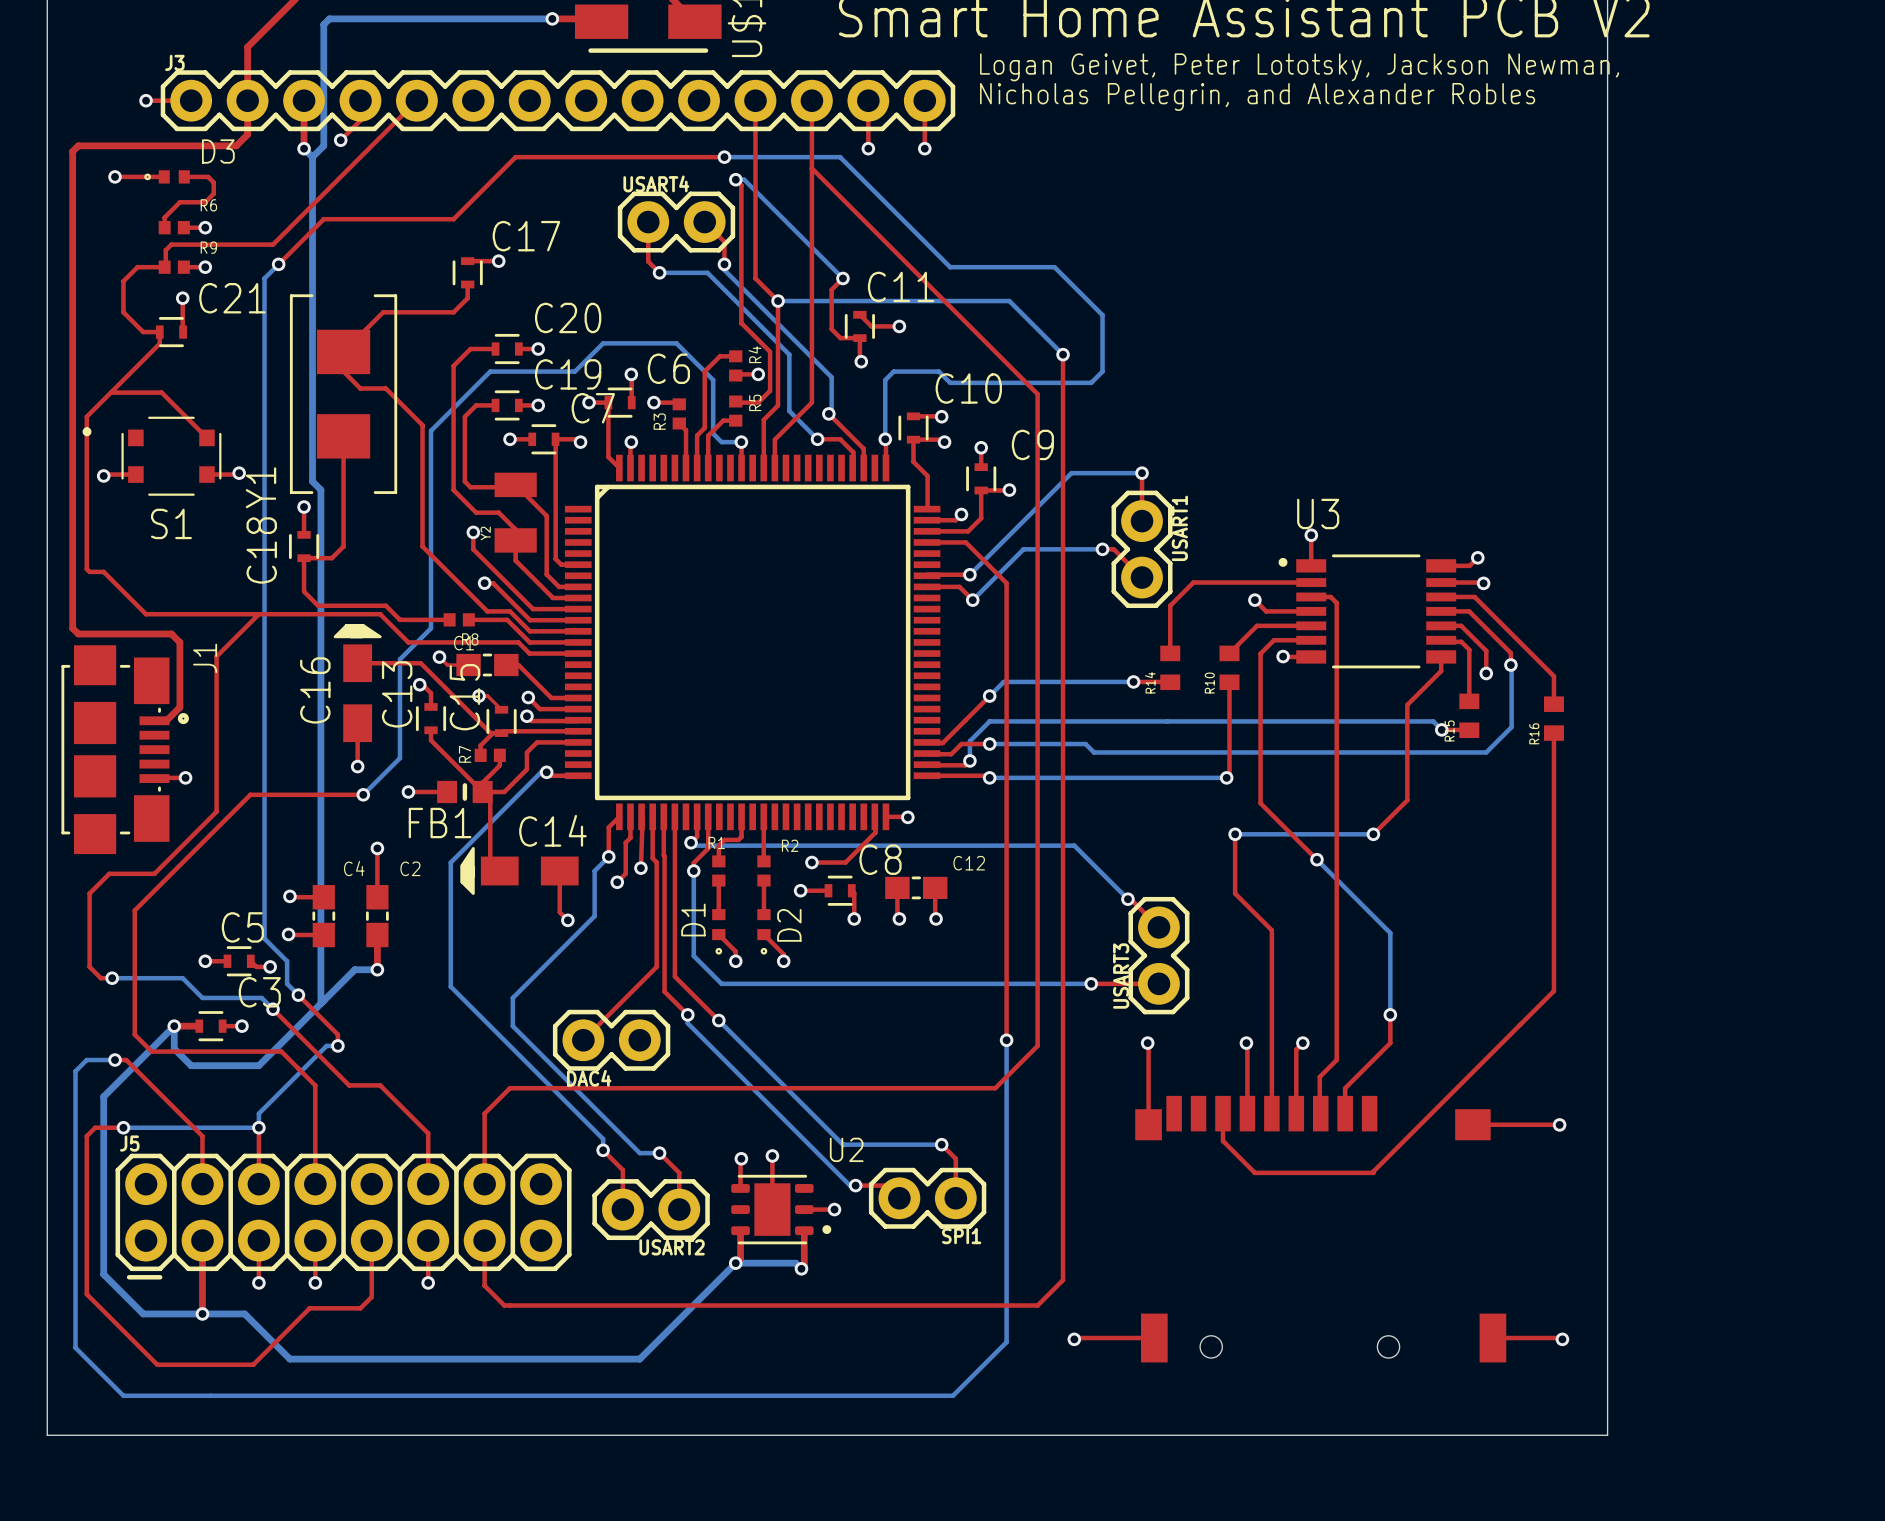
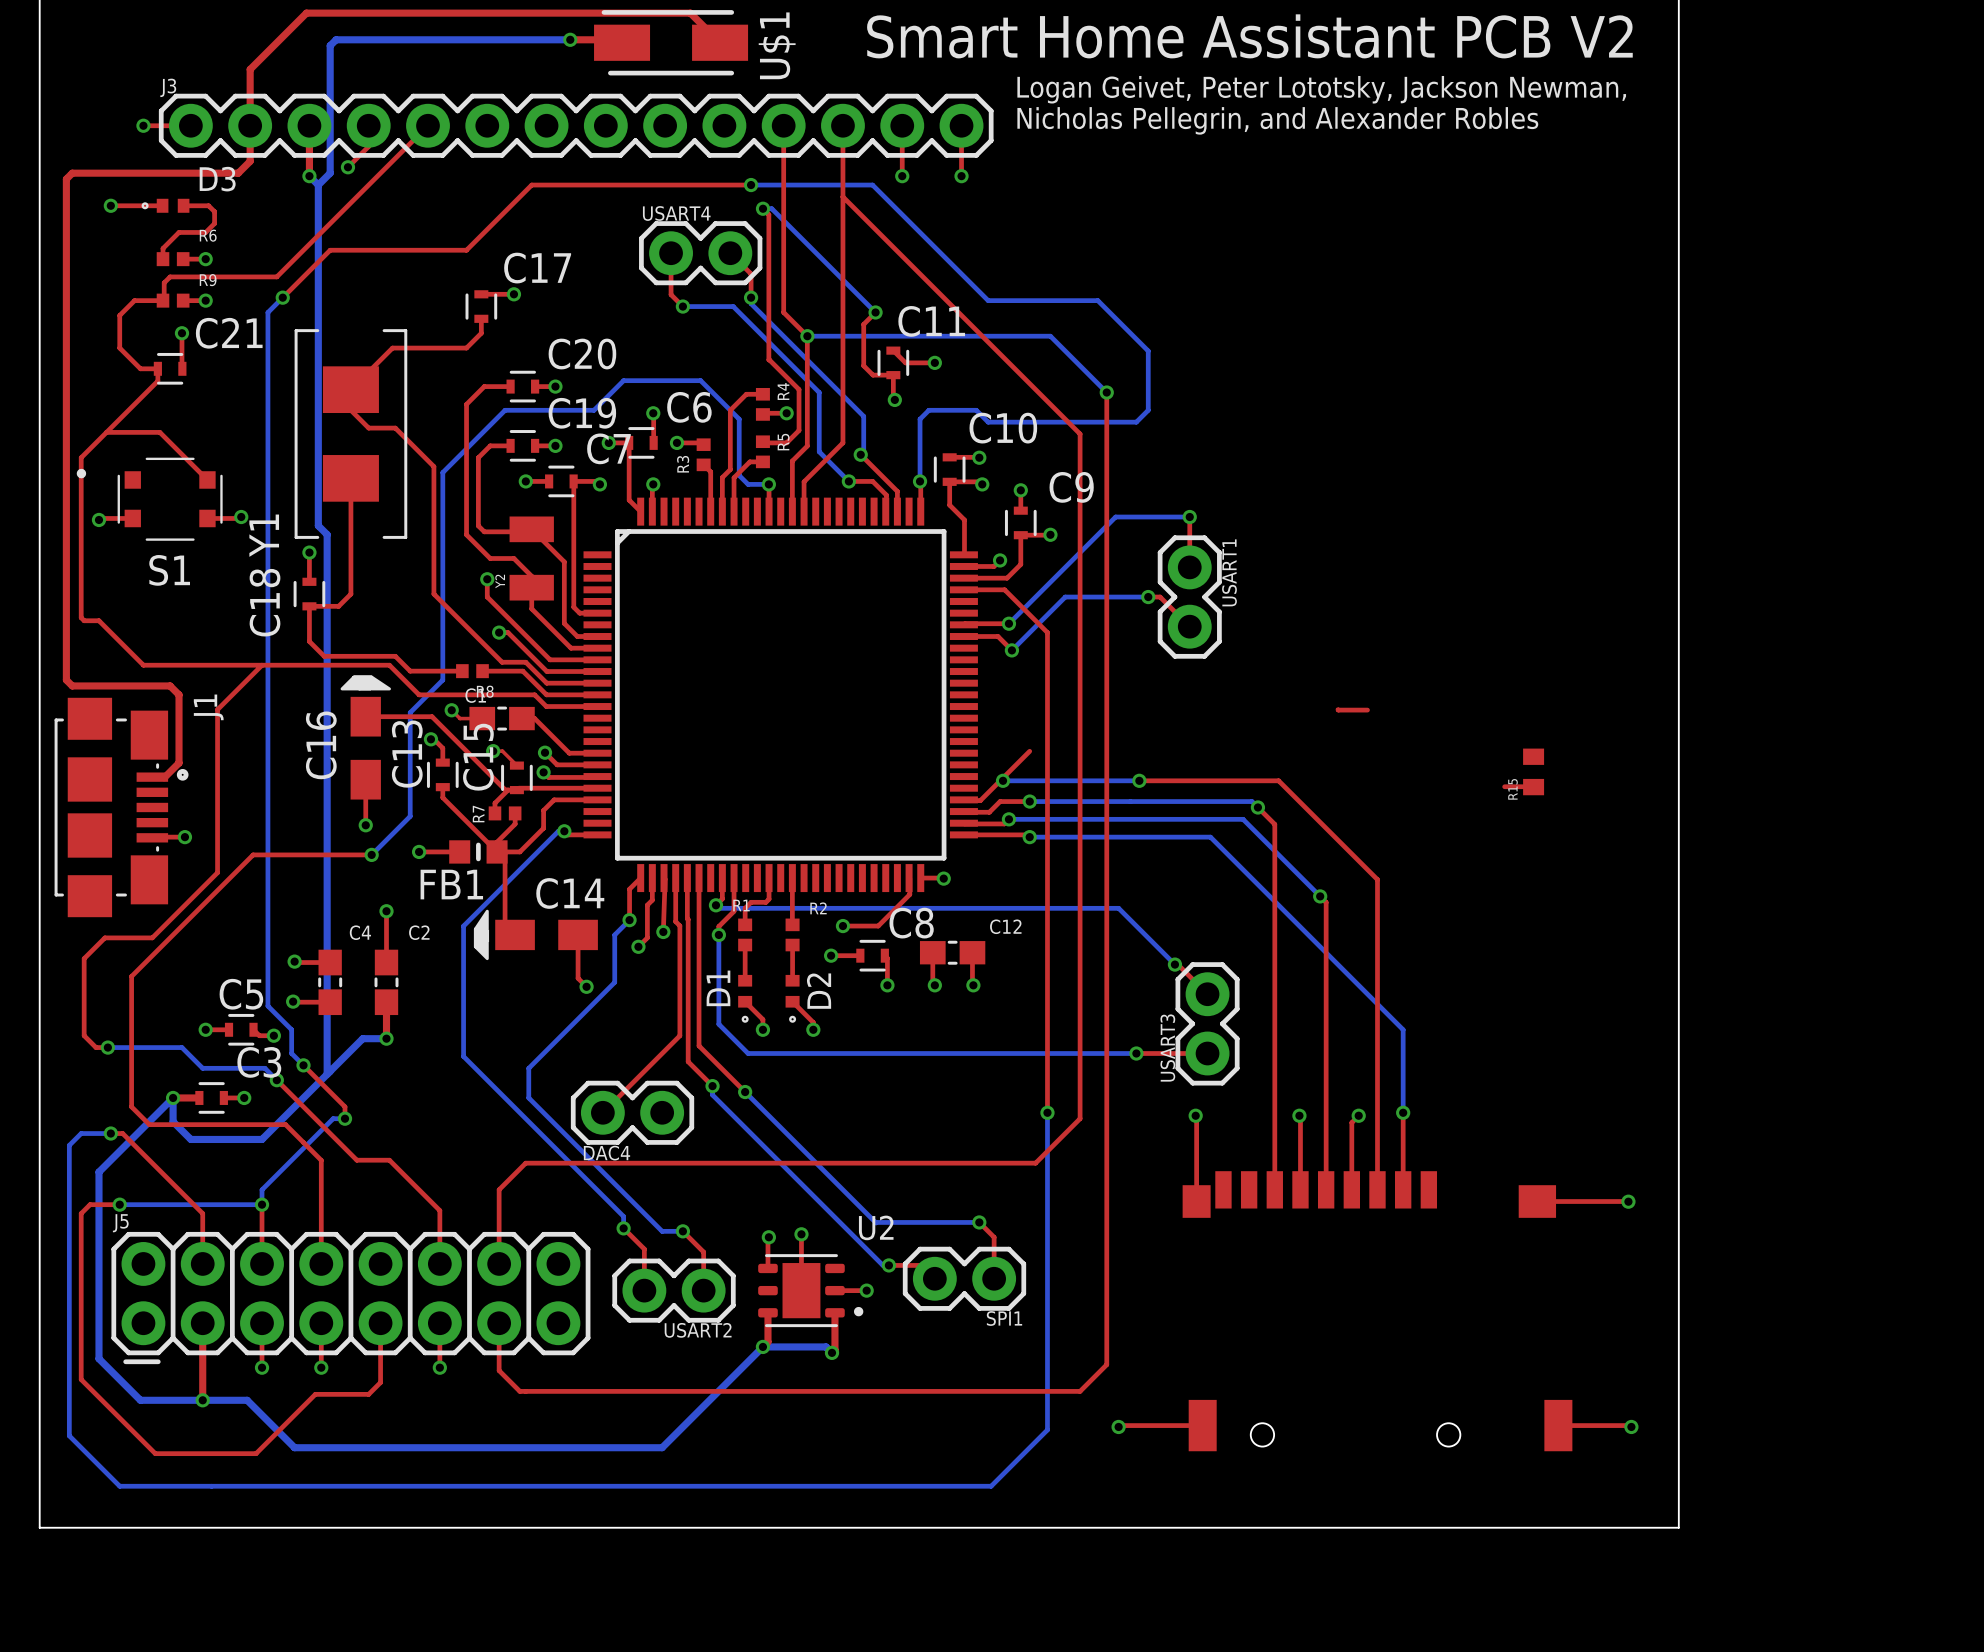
top track: (1311, 535) (1311, 565) -> none
via: (1311, 535) -> none
top track: (1477, 557) (1469, 565) (1441, 565) -> none
via: (1477, 557) -> none
top track: (1311, 582) (1193, 582) (1170, 605) (1170, 653) -> none
top track: (1441, 582) (1483, 583) -> none
via: (1483, 583) -> none
top track: (1311, 596) (1330, 596) (1336, 602) (1336, 1060) (1319, 1076) (1320, 1113) -> (1139, 780) (1278, 780) (1377, 879) (1377, 1189)
top track: (1441, 596) (1474, 596) (1553, 676) (1553, 704) -> none
top track: (1254, 600) (1266, 611) (1311, 611) -> none
via: (1254, 600) -> none
U3: (1367, 611) -> none
top track: (1441, 611) (1469, 611) (1510, 653) (1510, 665) -> none
top track: (1311, 625) (1257, 625) (1229, 653) -> none
top track: (1441, 625) (1461, 625) (1486, 650) (1486, 673) -> none
top track: (1311, 640) (1273, 640) (1260, 653) (1260, 803) (1316, 859) -> none
top track: (1441, 640) (1461, 641) (1469, 649) (1469, 701) -> none
via: (1283, 656) -> none
top track: (1441, 656) (1441, 671) (1407, 704) (1407, 800) (1373, 834) -> none
bottom track: (1510, 665) (1511, 727) (1486, 752) (1094, 752) (1085, 744) -> (1257, 807) (1252, 801) (1130, 801)
via: (1510, 665) -> none
R14: (1170, 667) -> none
R10: (1229, 667) -> none
via: (1486, 673) -> none
top track: (1133, 681) (1170, 682) -> none
bottom track: (1133, 681) (1003, 681) (989, 696) -> none
via: (1133, 681) -> none
top track: (1229, 682) (1229, 775) (1226, 777) -> none
via position: (989, 696) -> (1003, 780)
R16: (1553, 718) -> none
bottom track: (989, 721) (969, 741) (969, 760) -> (1320, 896) (1243, 819) (1008, 819)
bottom track: (989, 721) (1433, 721) (1441, 729) -> none
bottom track: none -> (1003, 780) (1139, 780)
via: none -> (1139, 780)
via: (1441, 729) -> none
top track: (1553, 733) (1553, 991) (1373, 1172) (1254, 1172) (1222, 1140) (1222, 1113) -> (1257, 807) (1274, 824) (1274, 1189)
via: none -> (1257, 807)
bottom track: (1161, 777) (1226, 777) -> (1210, 837) (1403, 1029) (1403, 1112)
via: (1226, 777) -> none
top track: (1235, 834) (1235, 893) (1271, 930) -> (1320, 896) (1326, 902) (1326, 997)
bottom track: (1235, 834) (1373, 834) -> none
via: (1235, 834) -> none
via: none -> (1320, 896)
via: (1373, 834) -> none
bottom track: (1316, 859) (1390, 933) (1390, 1014) -> none
via: (1316, 859) -> none
top track: (1390, 1014) (1390, 1043) (1345, 1088) -> (1403, 1112) (1403, 1163)
via position: (1390, 1014) -> (1403, 1112)

